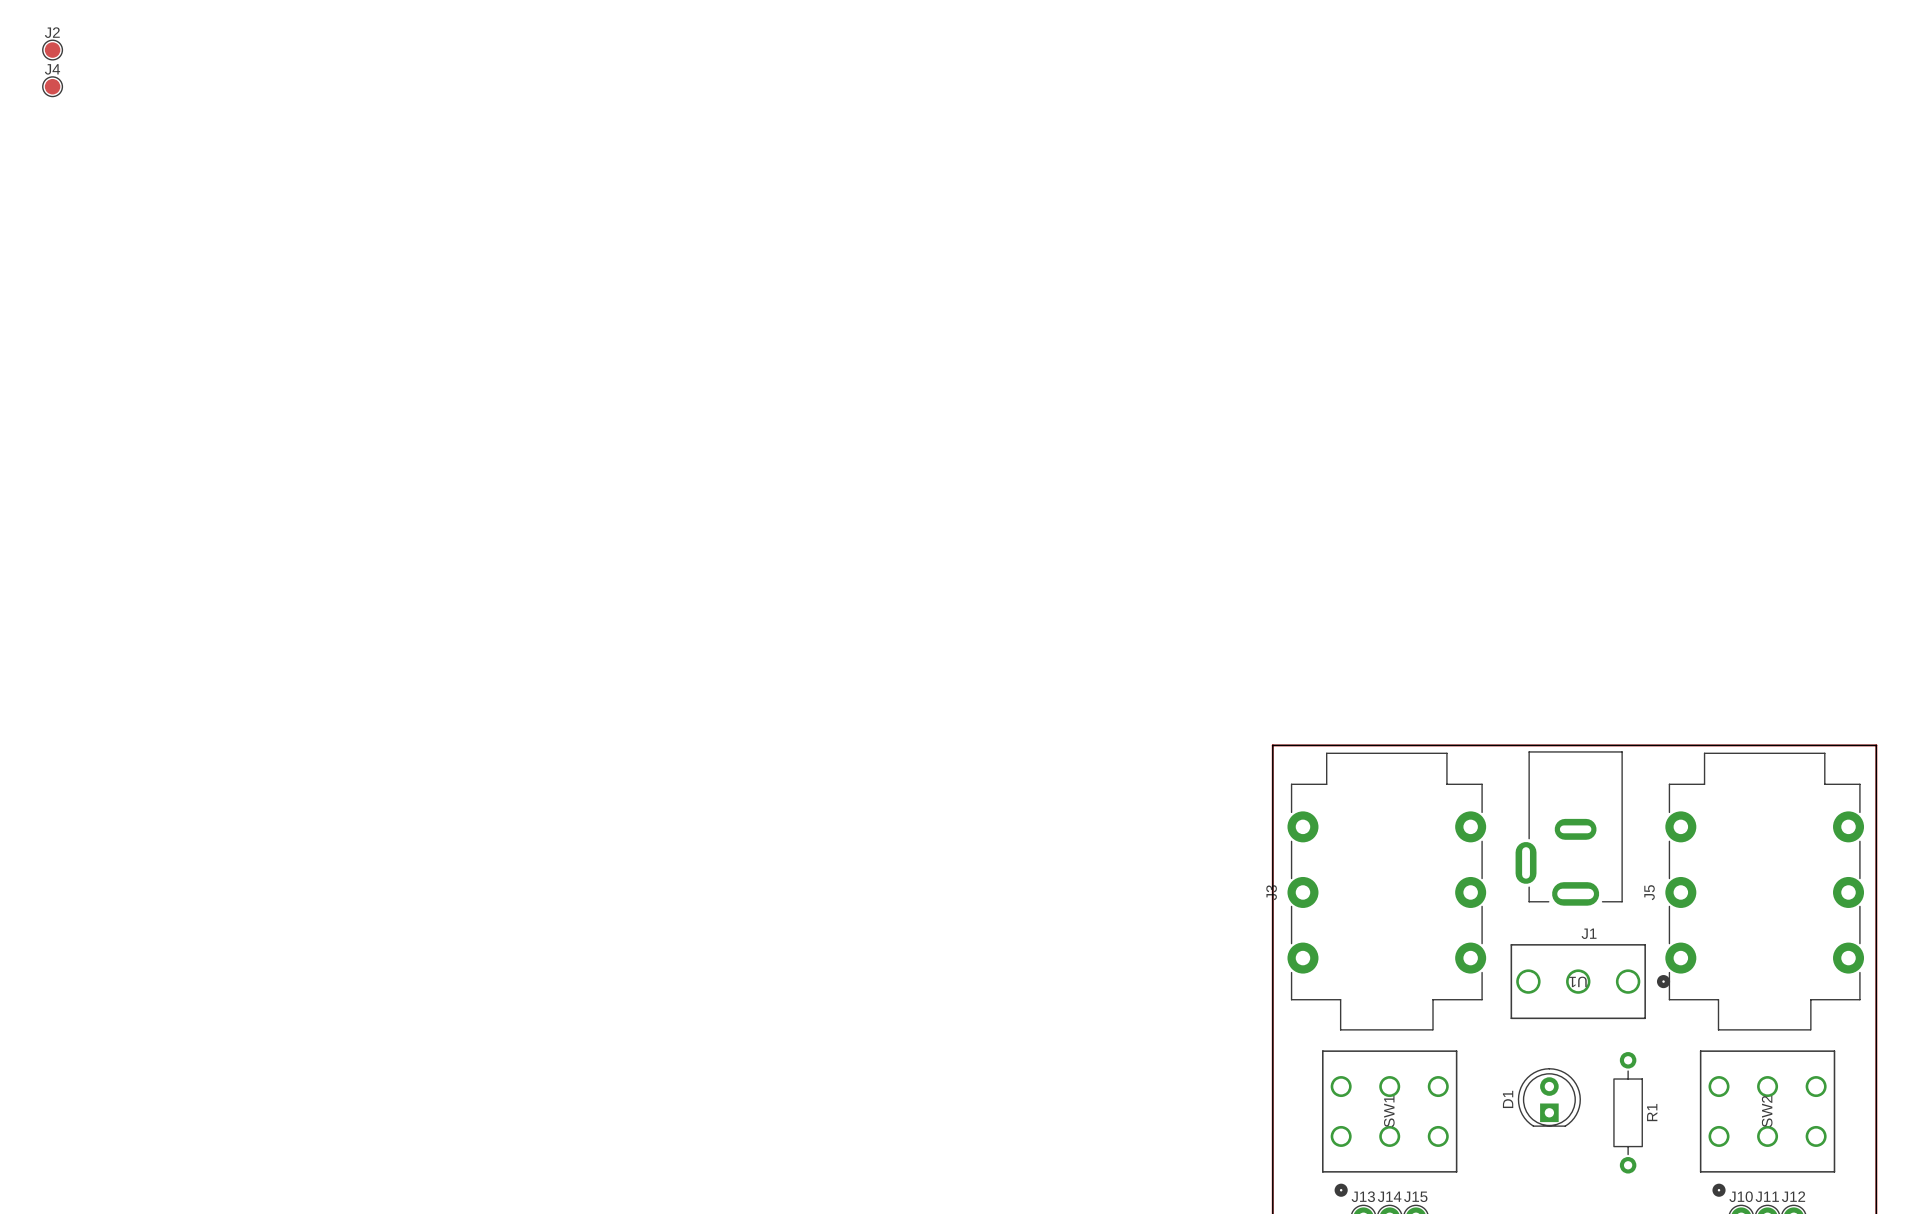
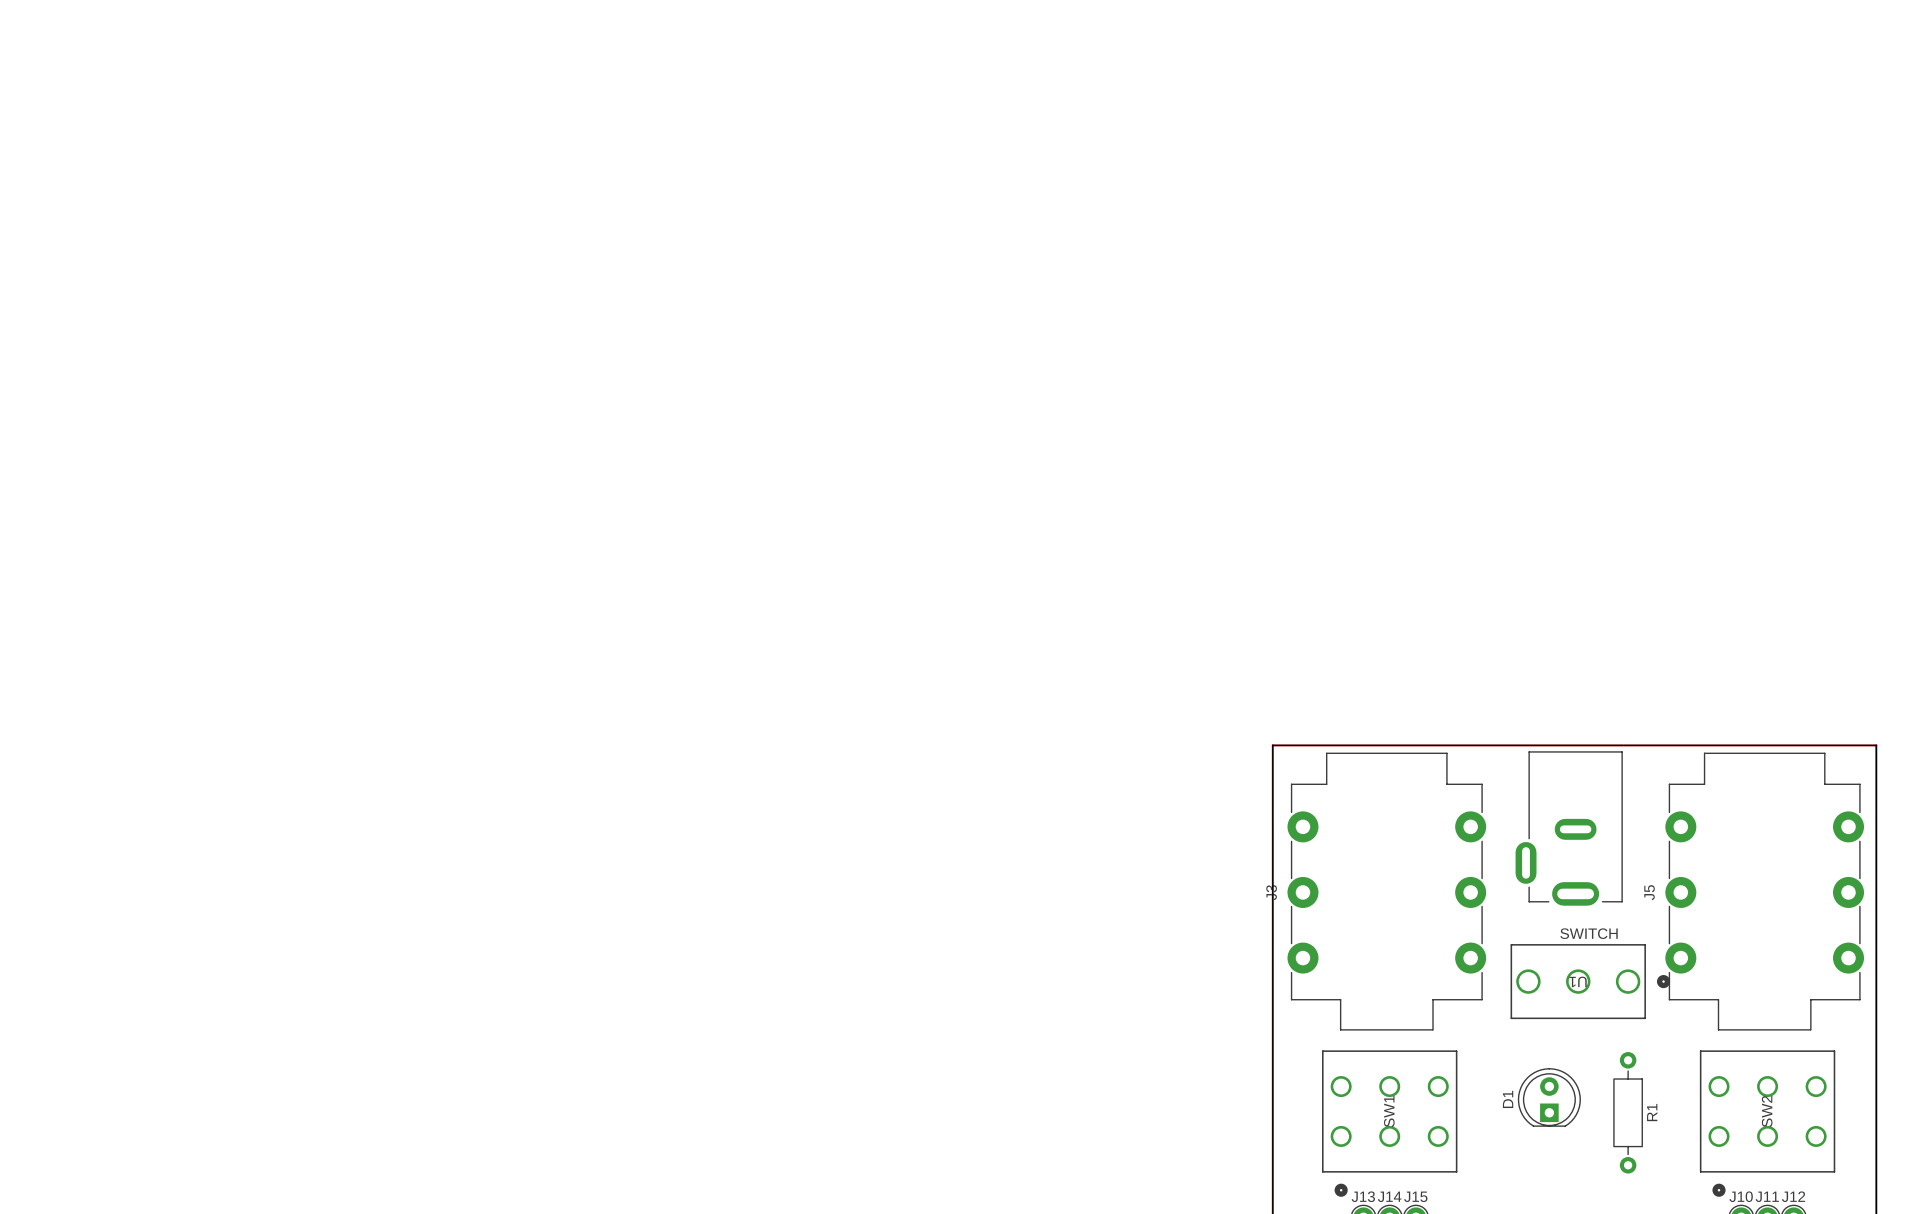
J2: (52, 50) -> none
J4: (52, 86) -> none
J1 name: J1 (1589, 933) -> SWITCH (1589, 933)

